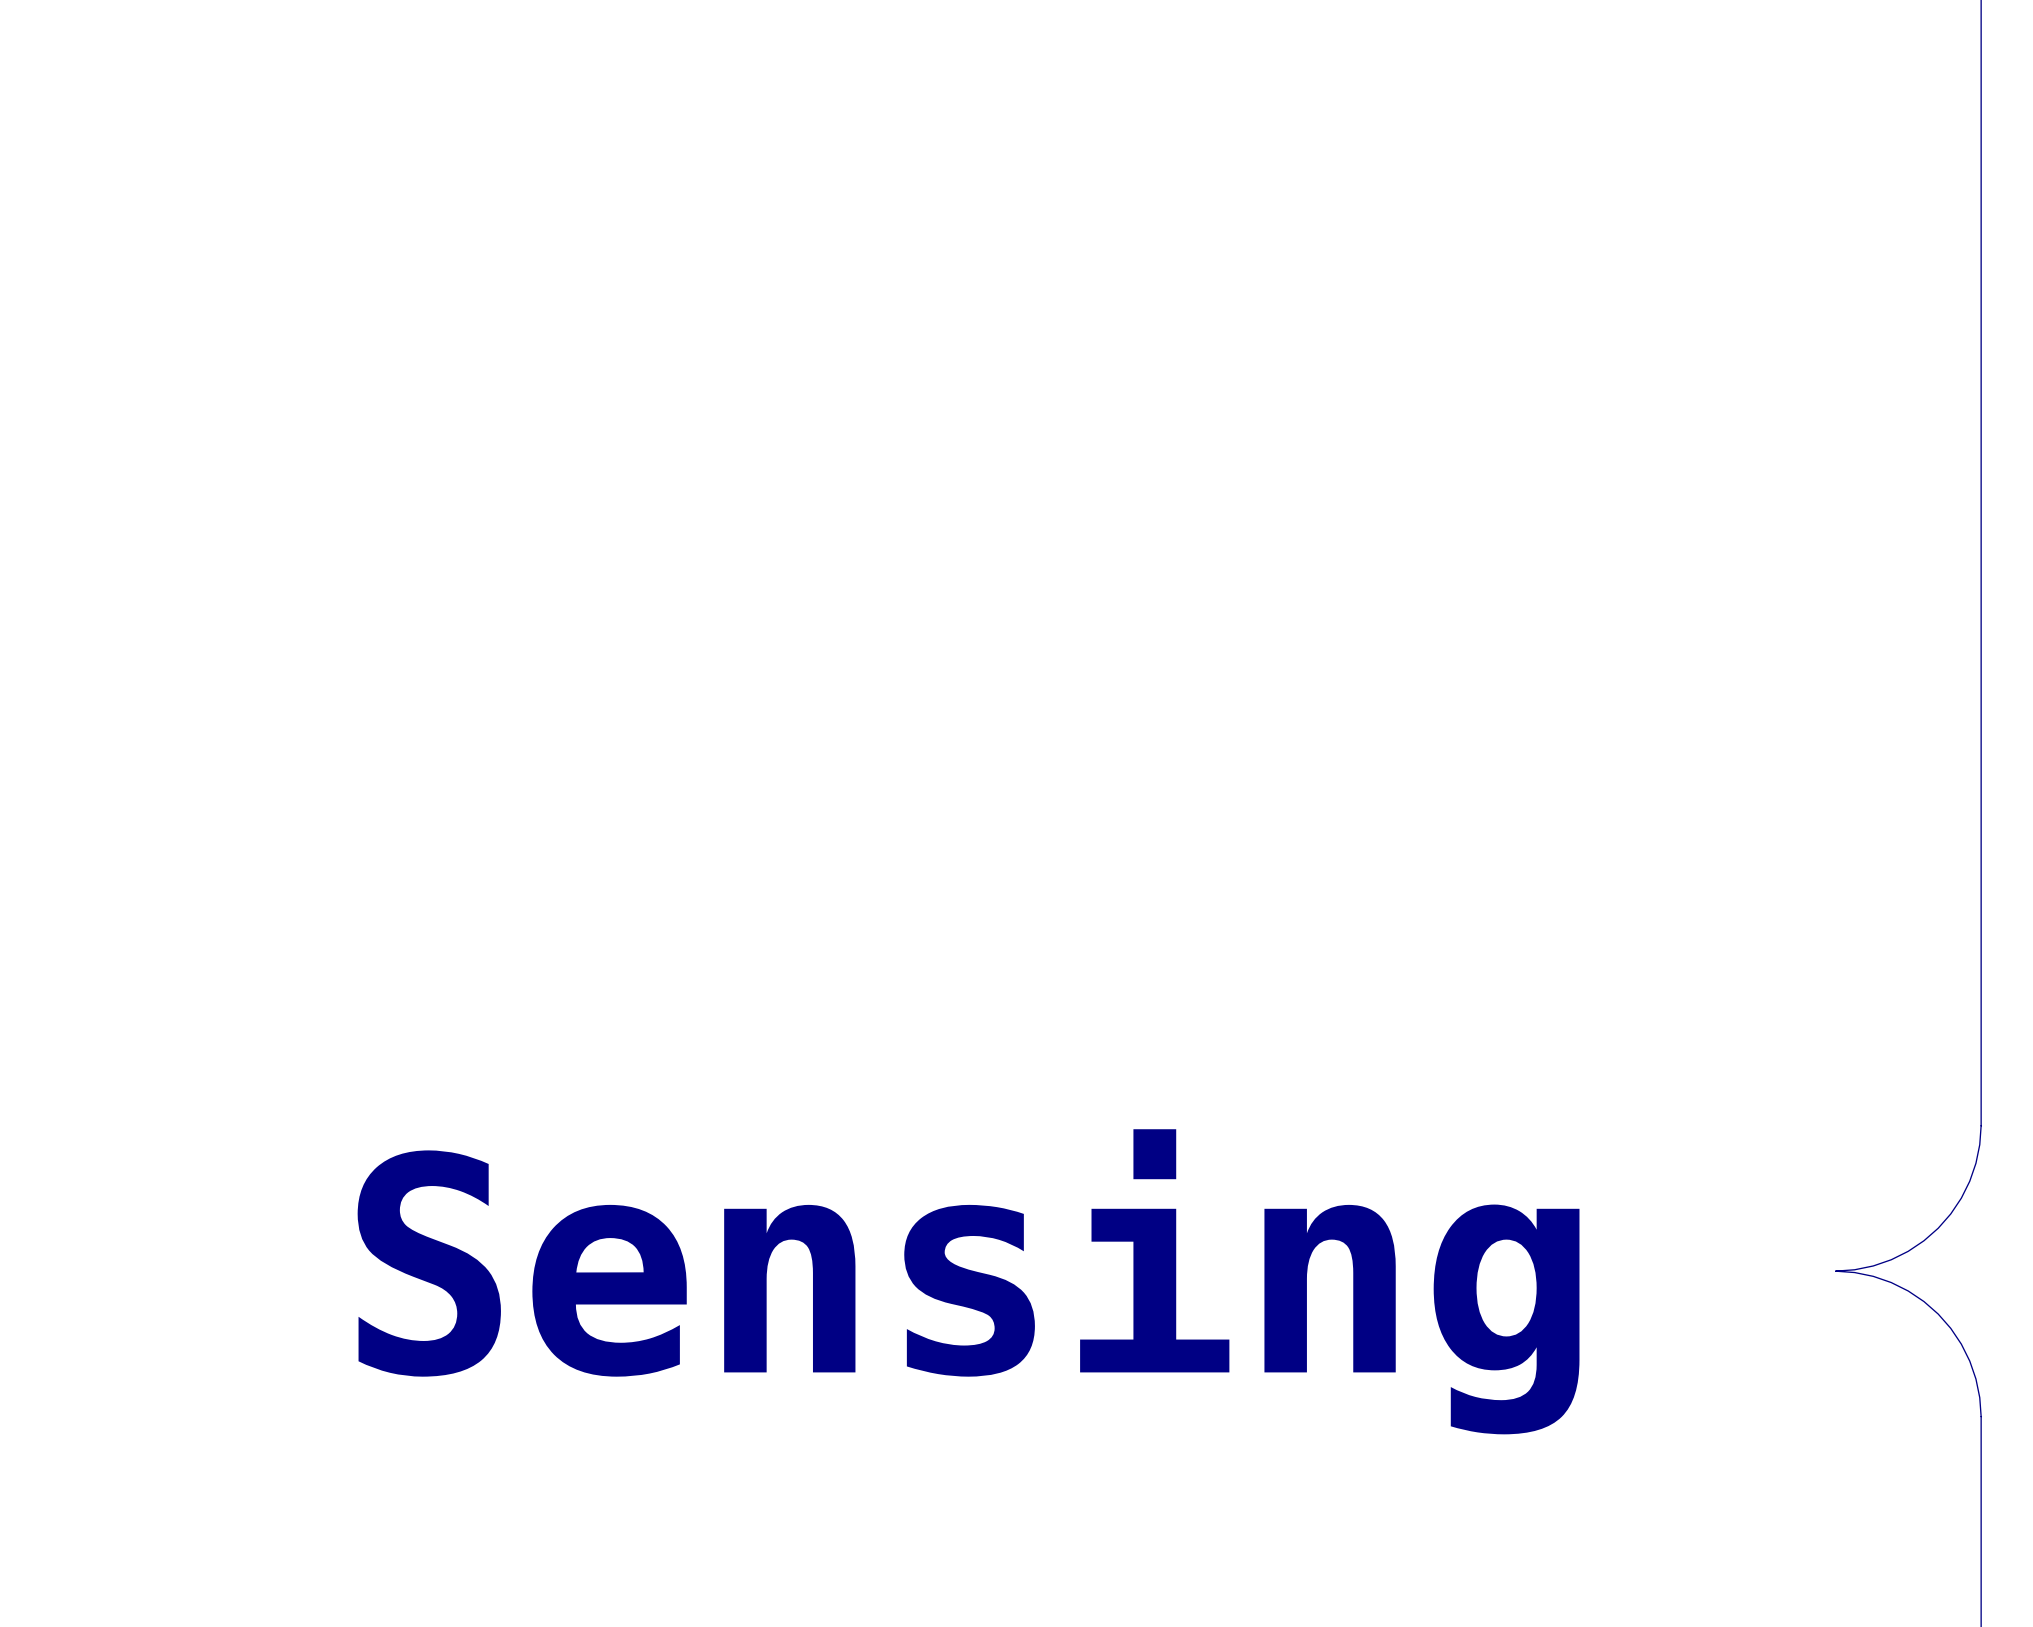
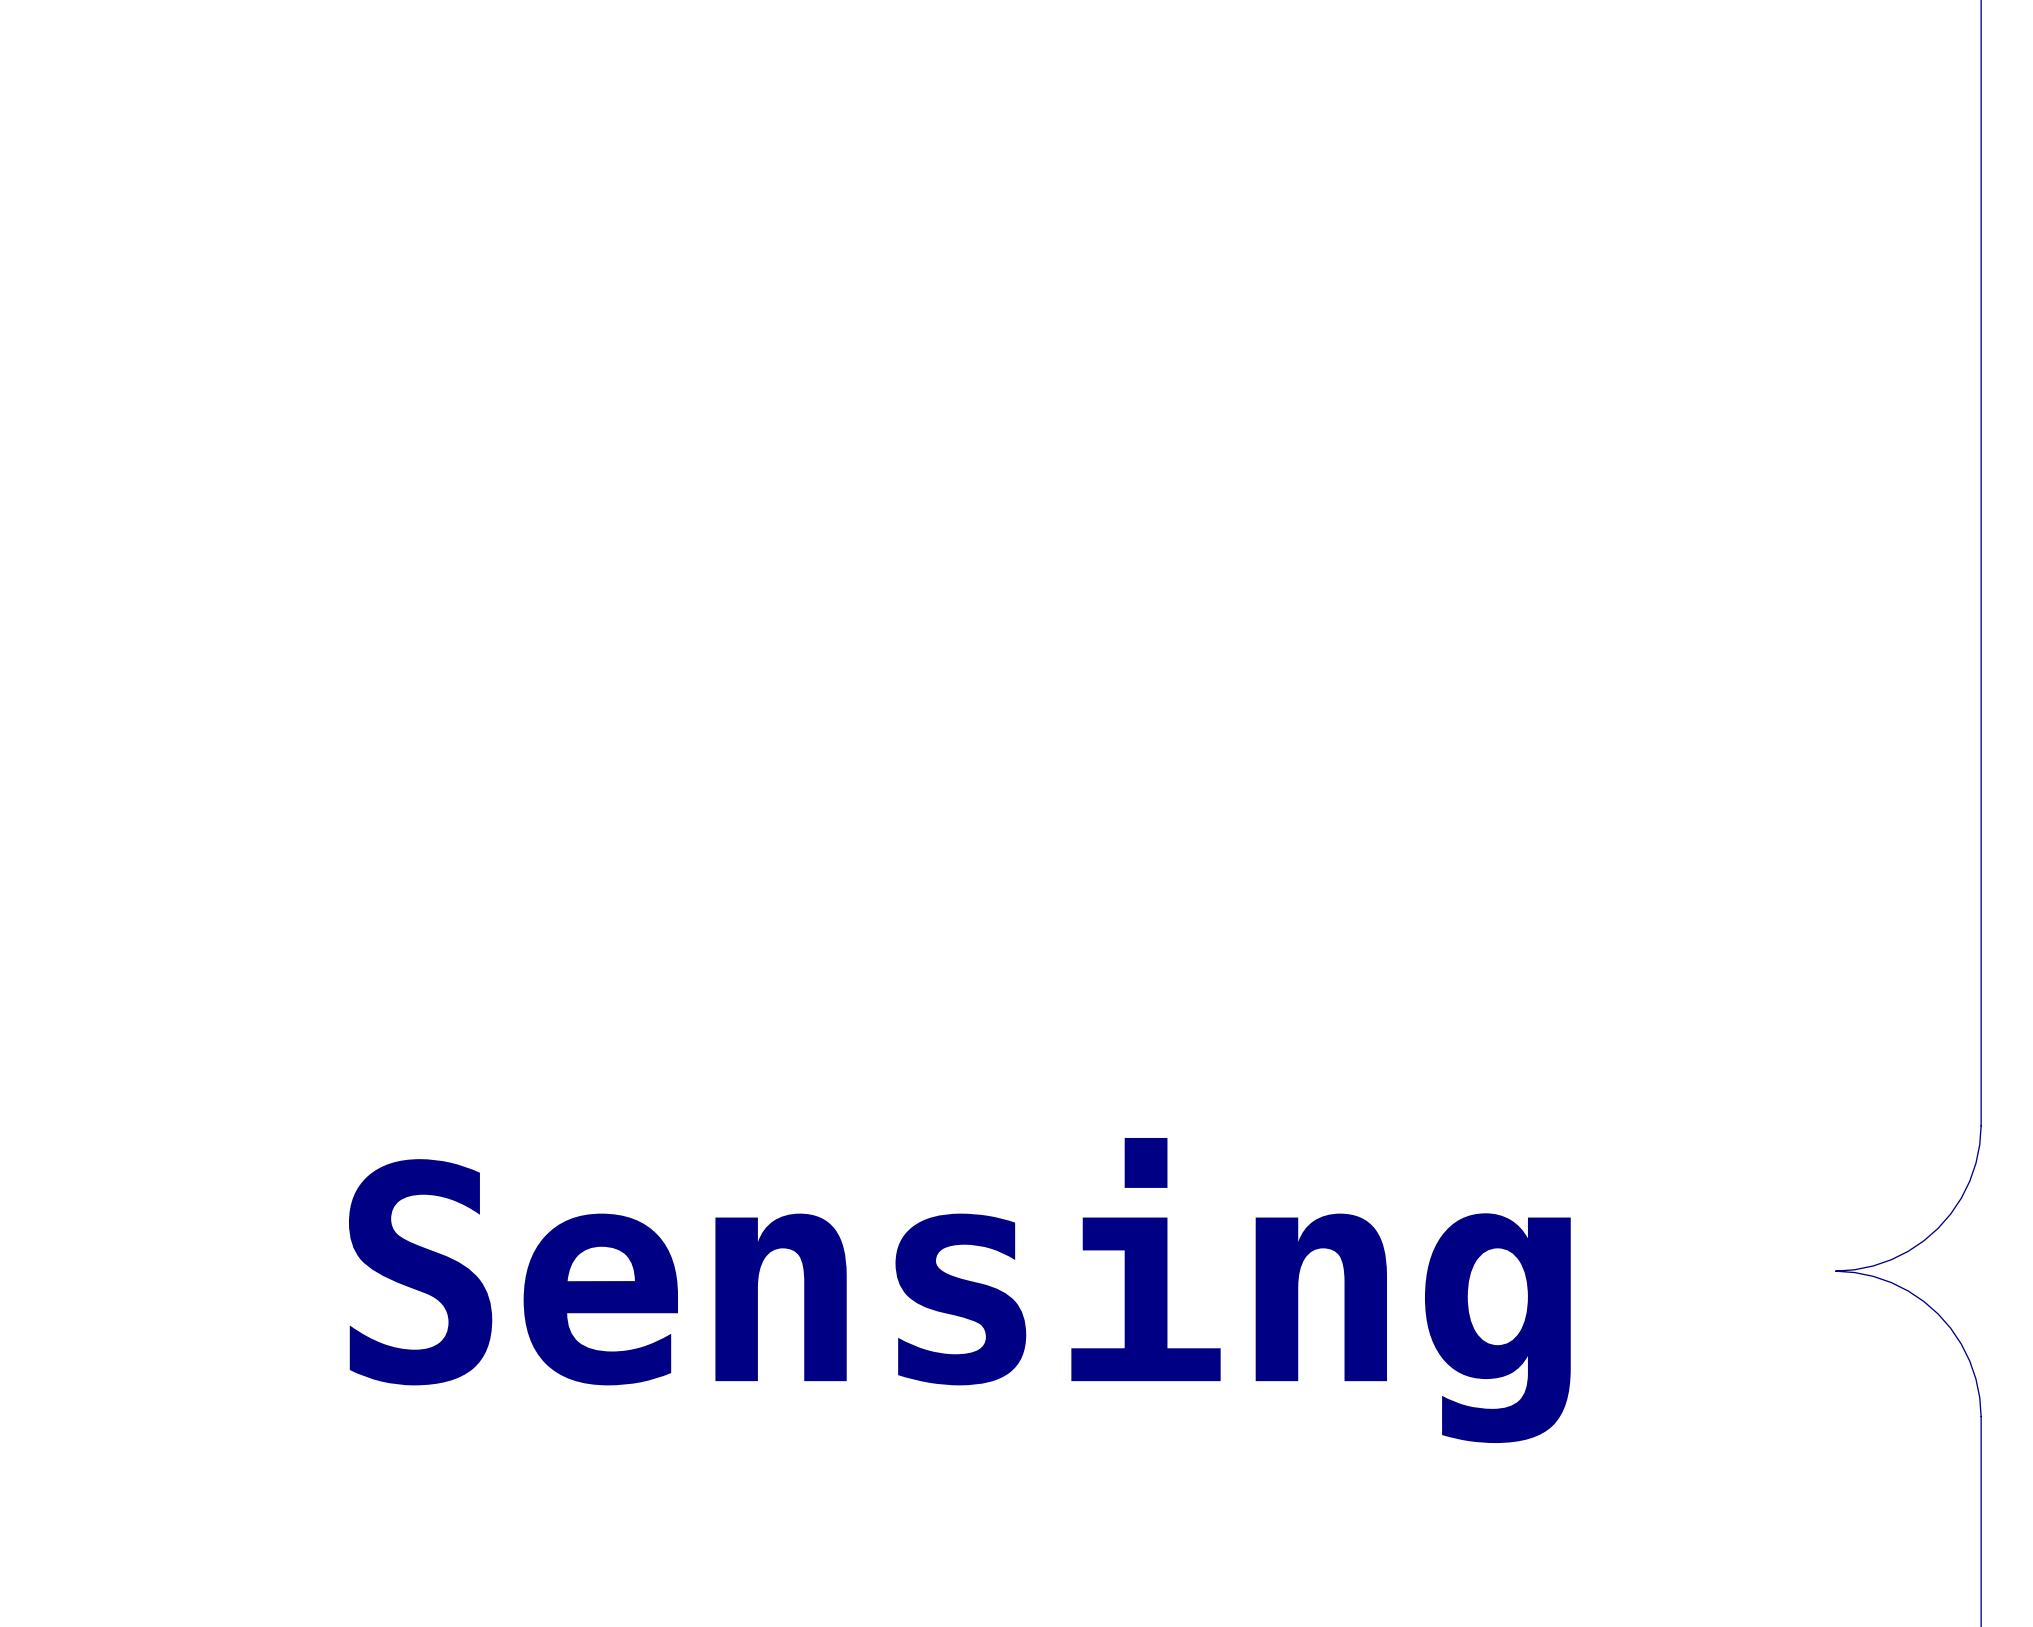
text position: Sensing (968, 1281) -> Sensing (959, 1290)

